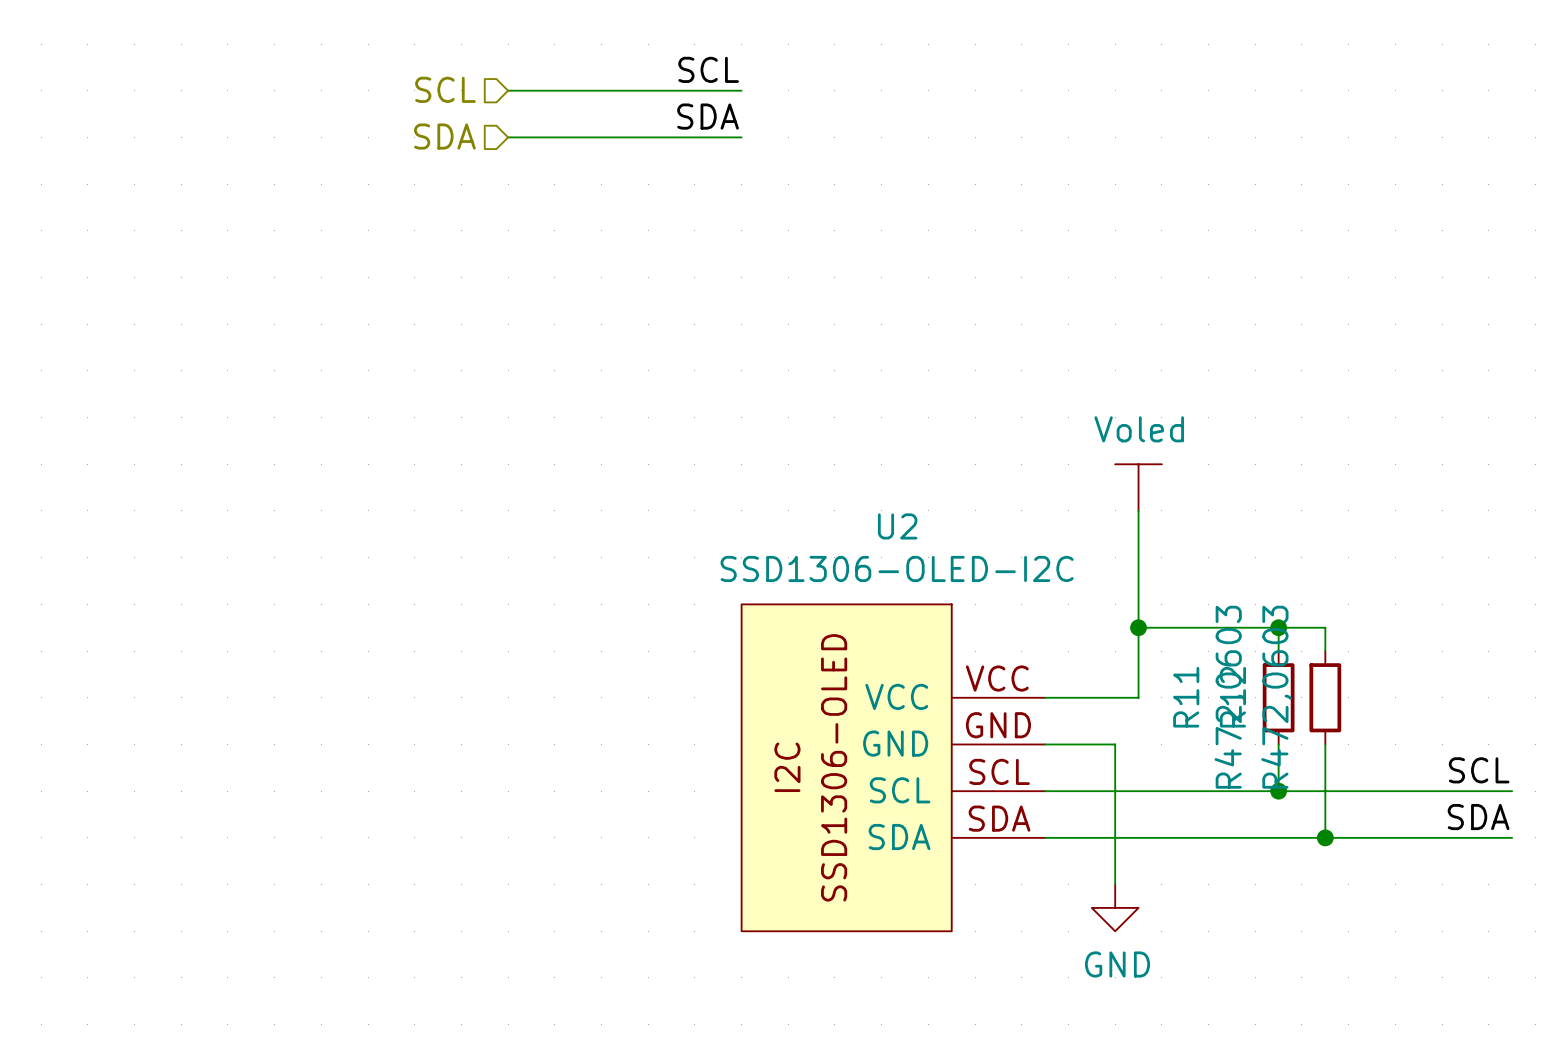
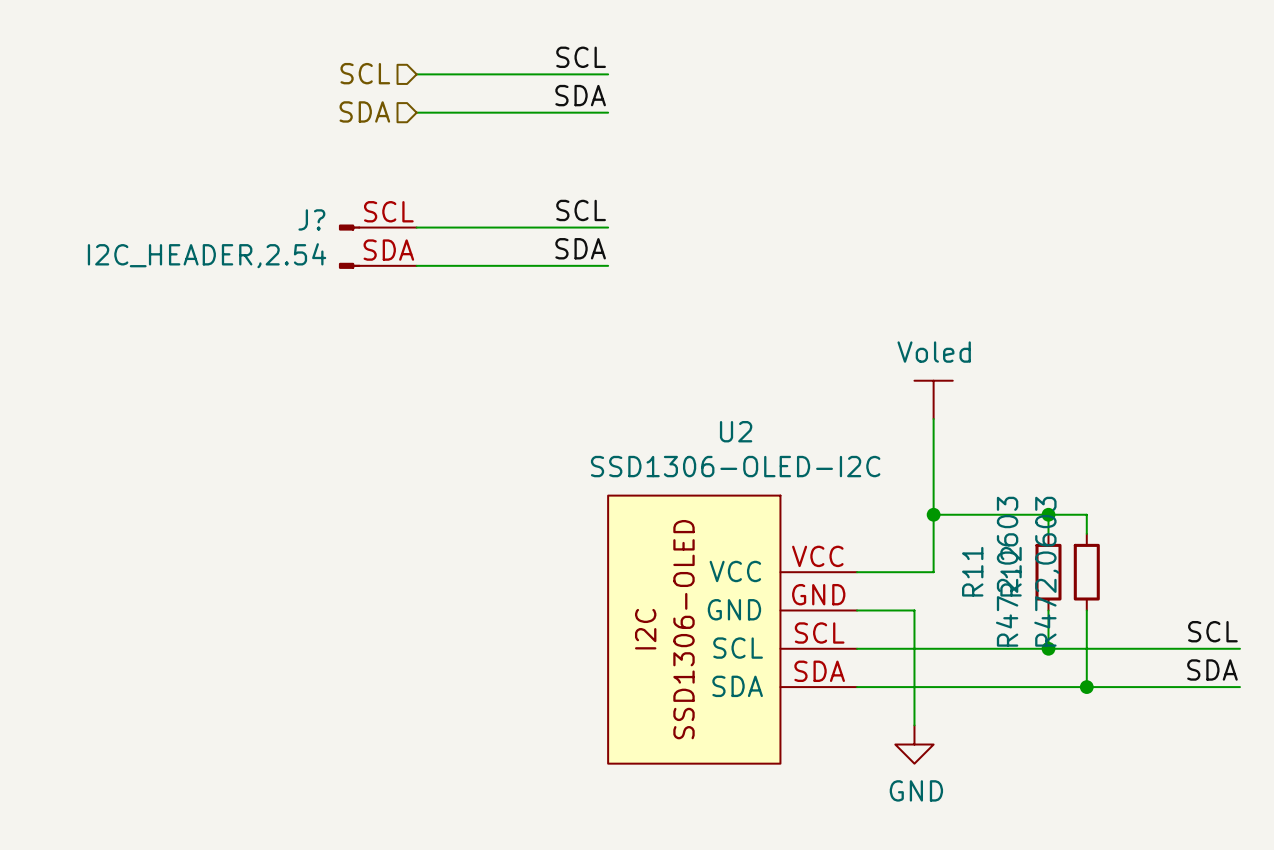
label: none -> SCL (581, 210)
wire: none -> (416, 227) (608, 227)
J?: none -> I2C_HEADER,2.54 (377, 246)
label: none -> SDA (580, 248)
wire: none -> (416, 265) (608, 265)

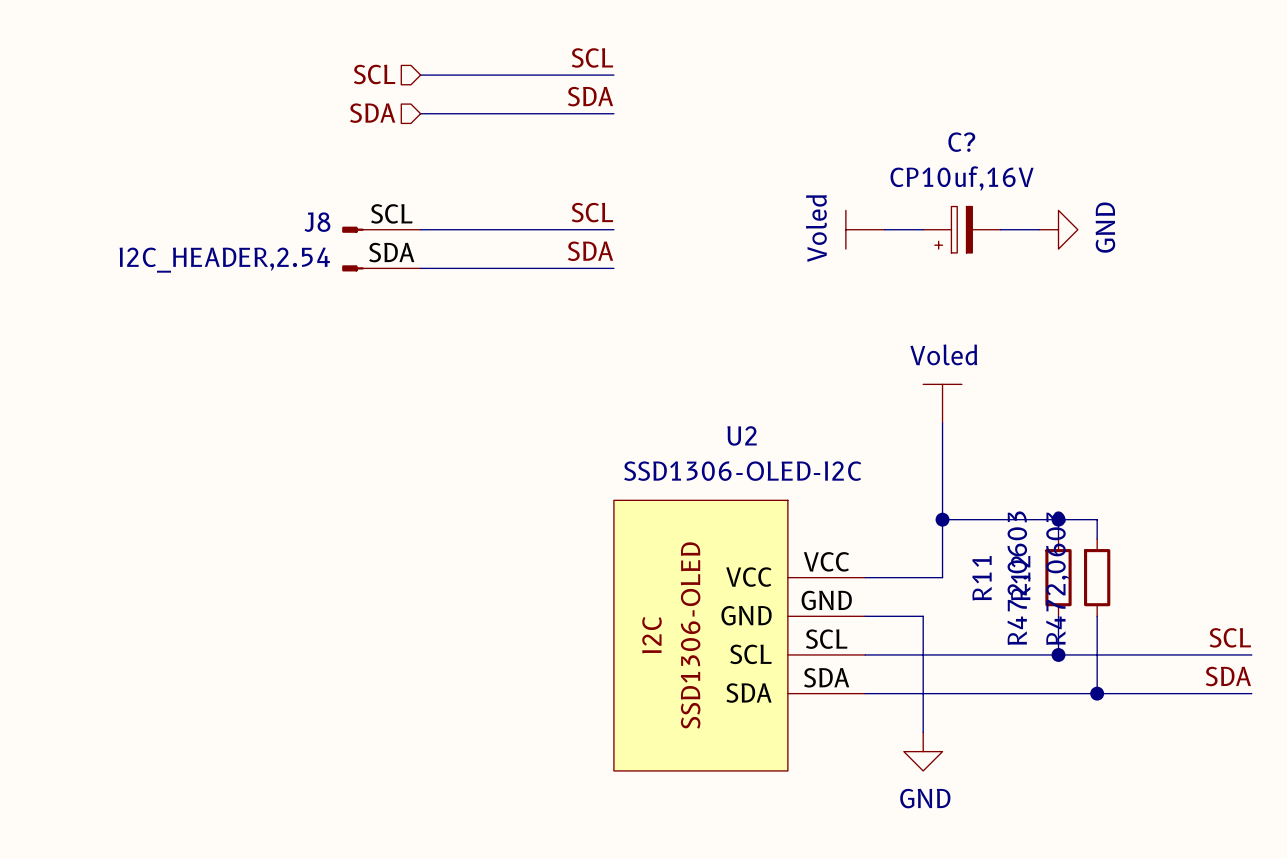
J? name: J? (311, 219) -> J8 (317, 222)
power symbol: none -> Voled (865, 229)
wire: none -> (884, 229) (923, 229)
C?: none -> CP10uf,16V (961, 229)
wire: none -> (1000, 229) (1039, 229)
power symbol: none -> GND (1058, 229)

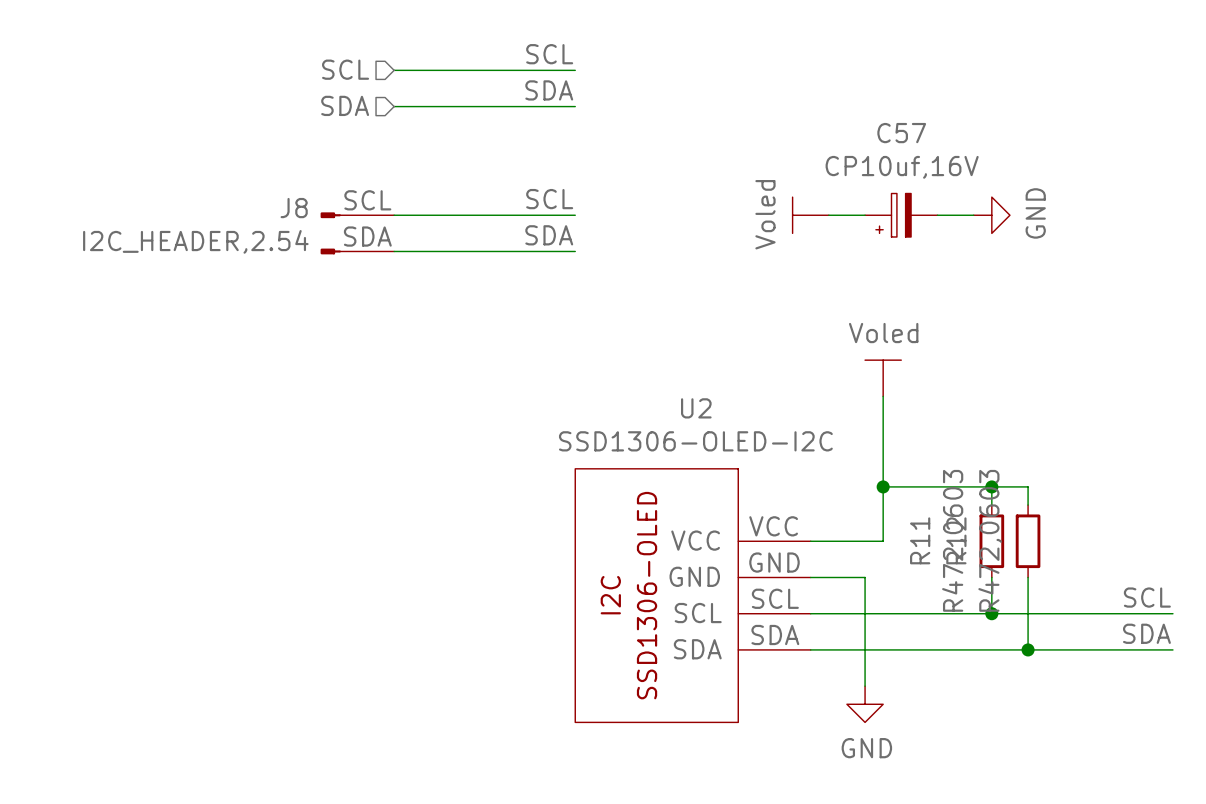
C? name: C? (961, 142) -> C57 (901, 133)

